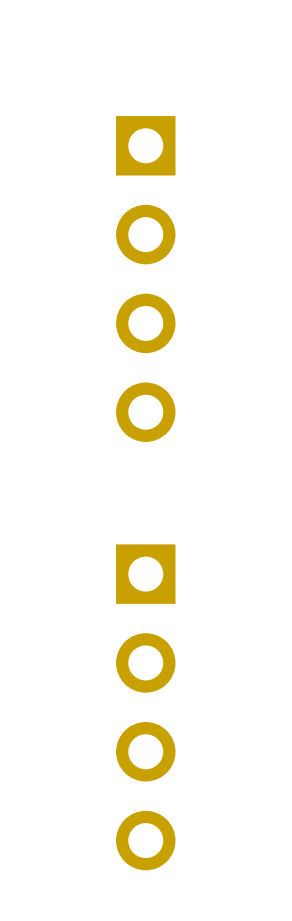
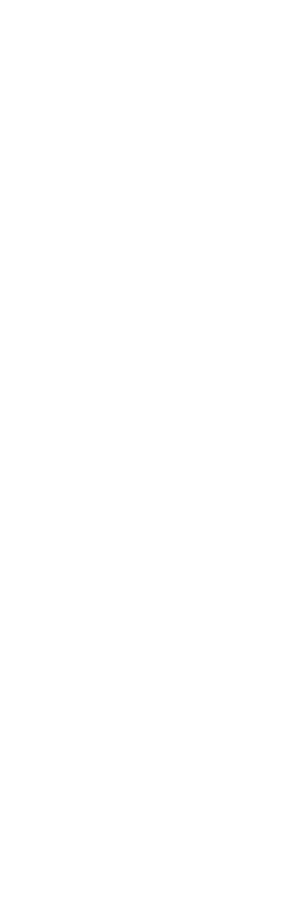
part: (145, 279) -> none
part: (145, 707) -> none

